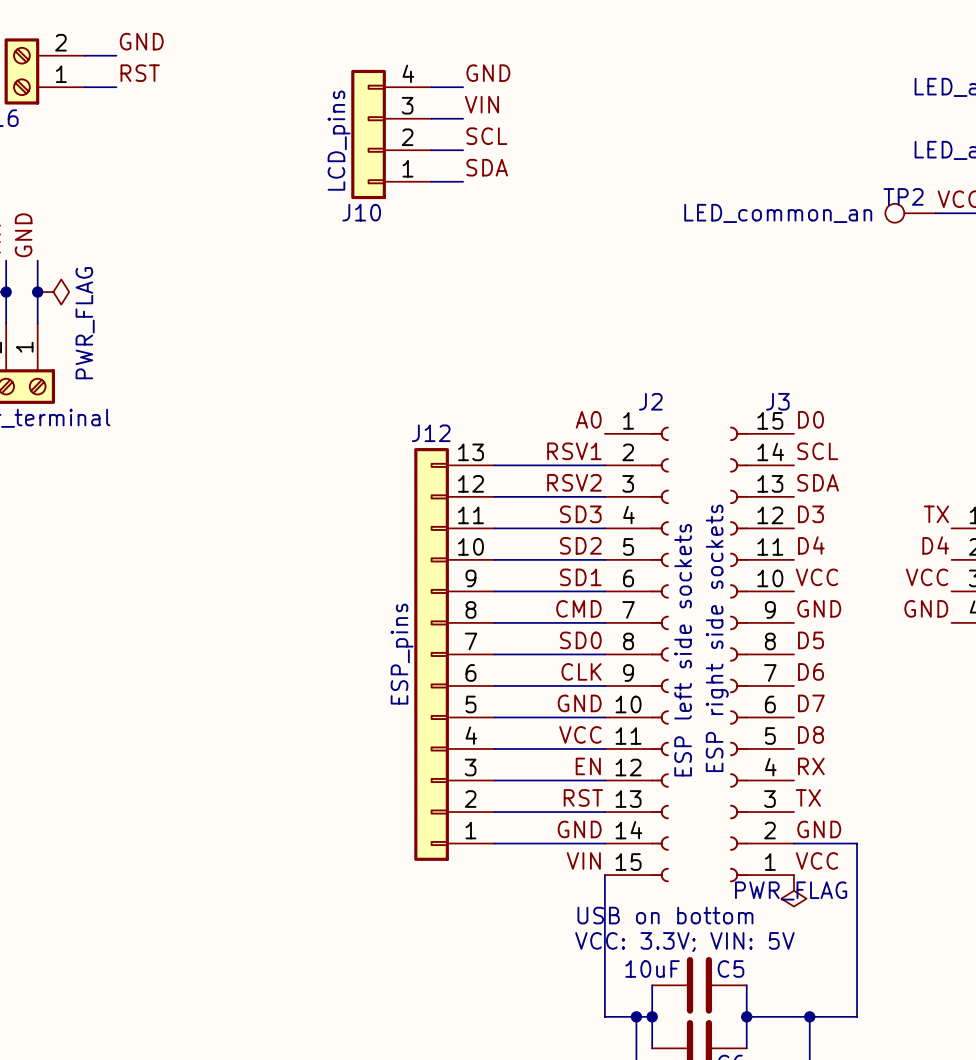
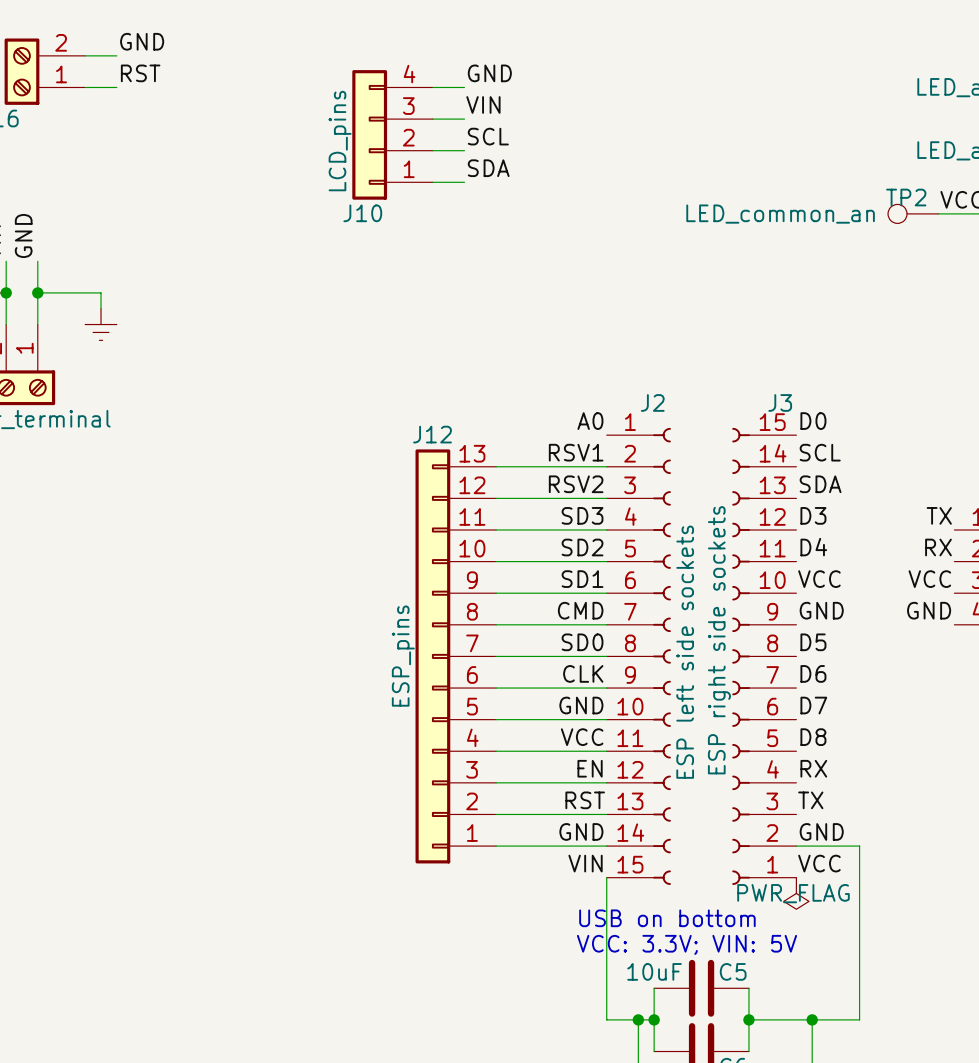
wire: none -> (37, 292) (101, 292) (101, 308)
power symbol: PWR_FLAG (53, 292) -> none
power symbol: none -> (101, 324)
label: D4 (935, 545) -> RX (938, 547)

